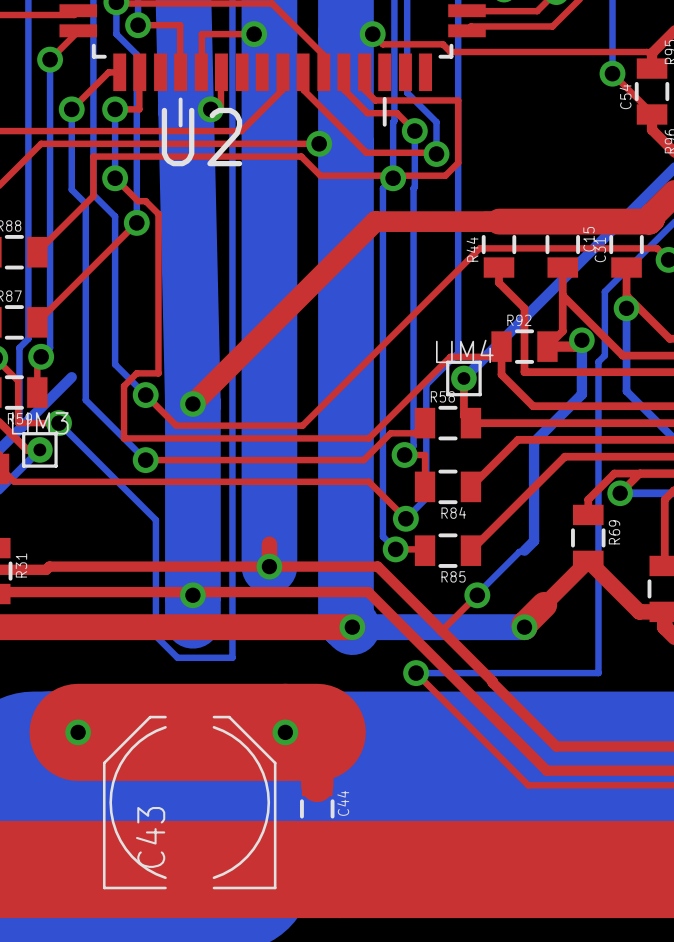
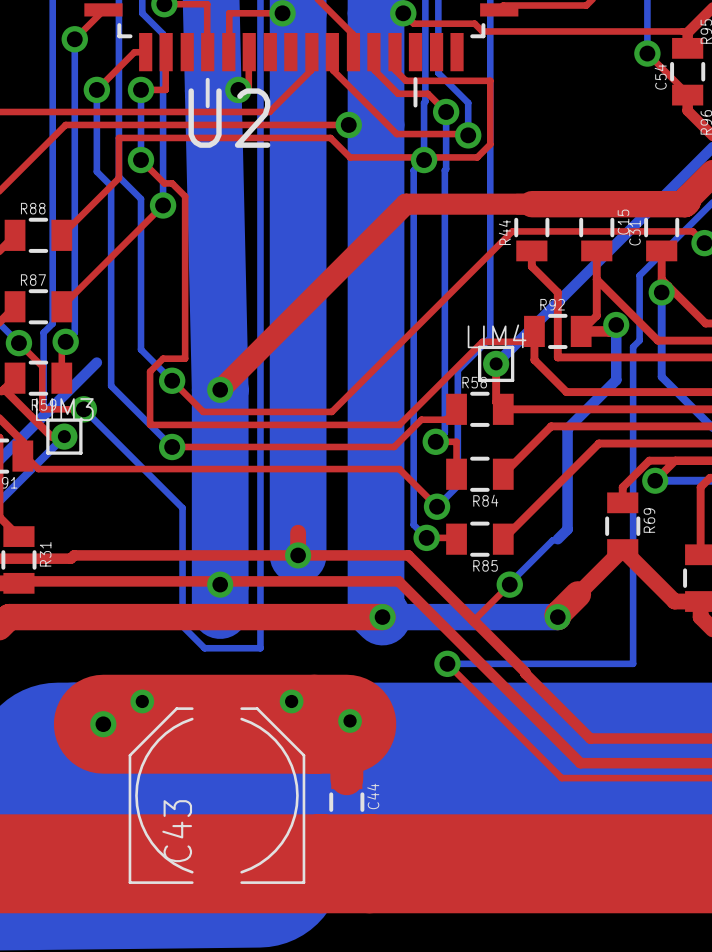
via: none -> (142, 701)
via: none -> (291, 701)
via: none -> (350, 720)
via: (285, 732) -> none

